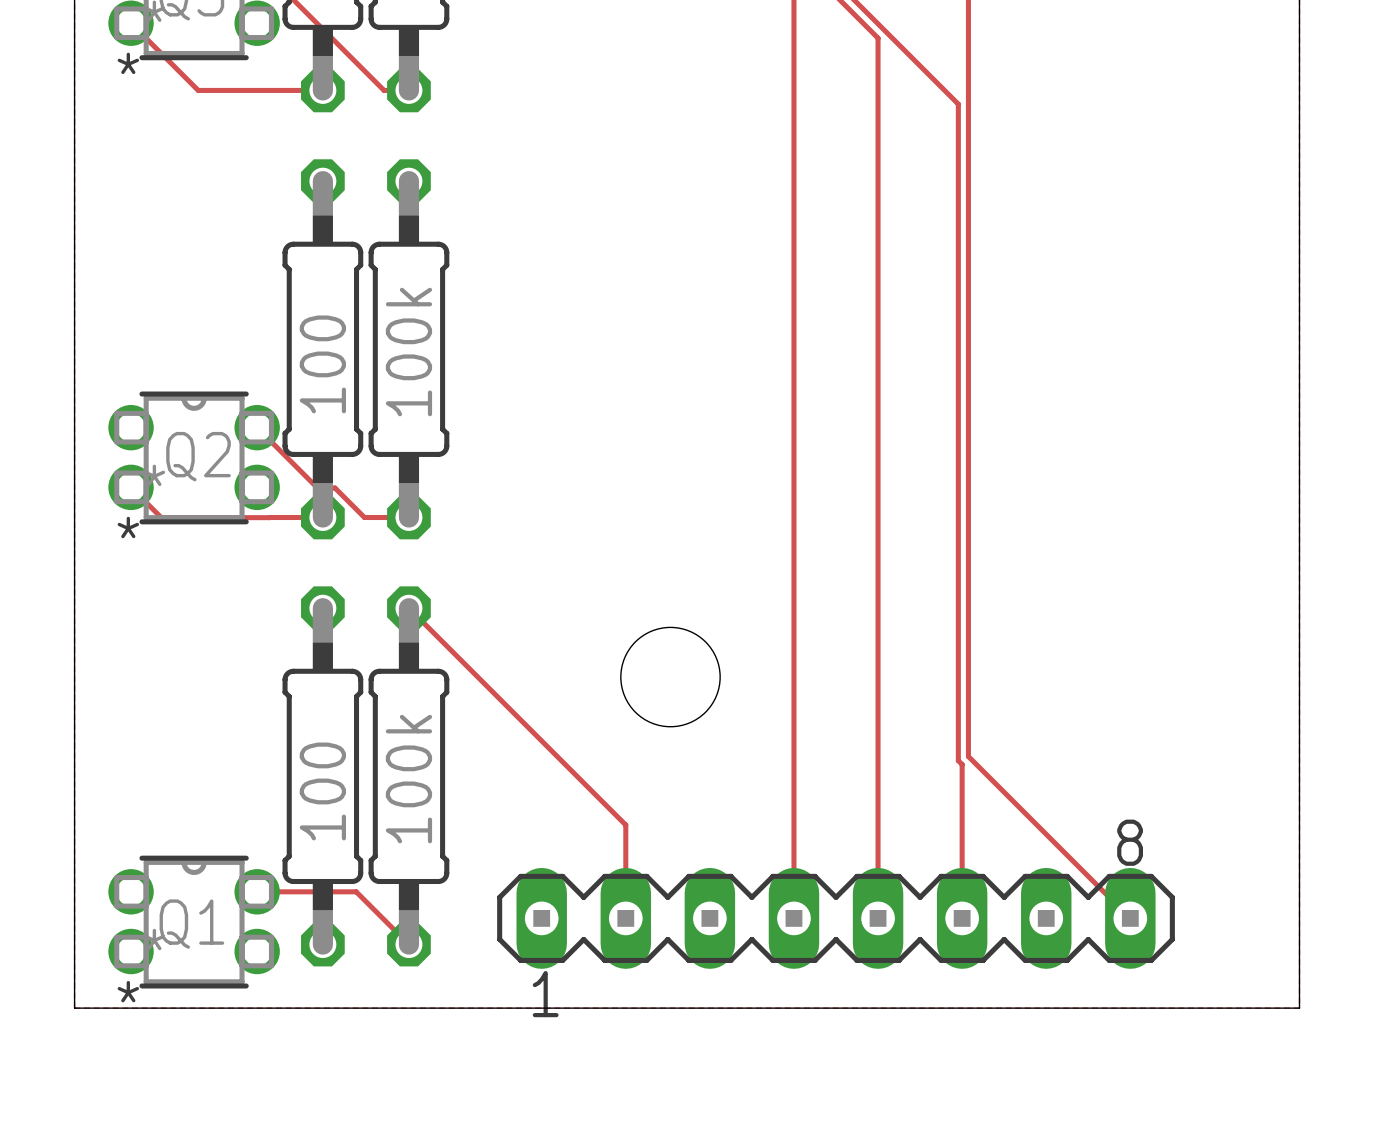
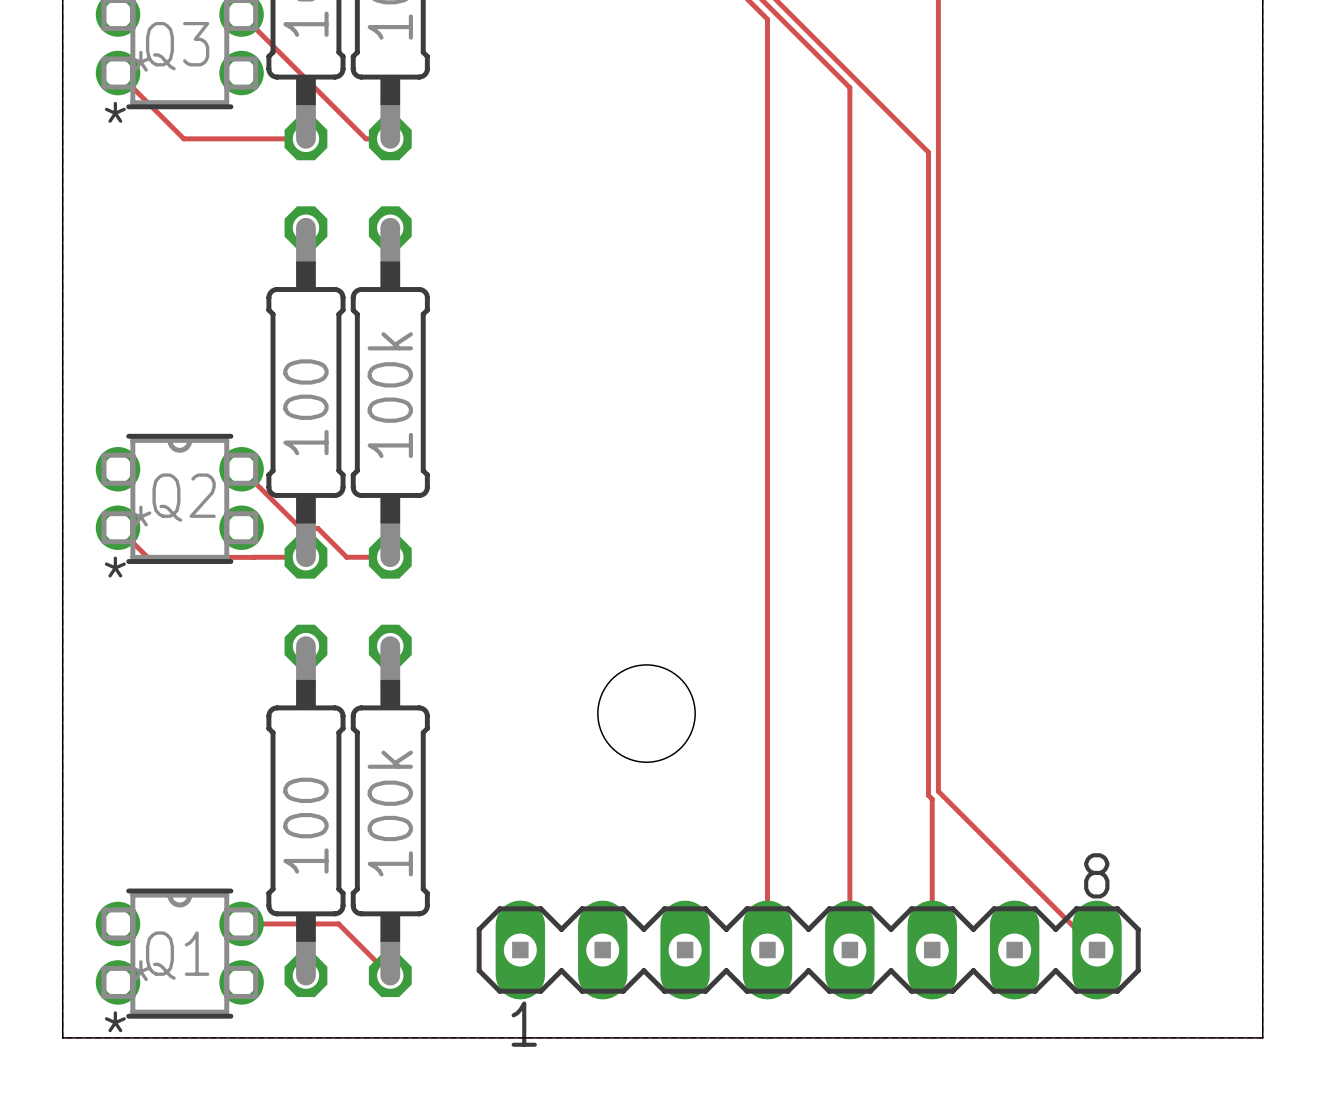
track: (408, 608) (625, 825) (625, 918) -> none

